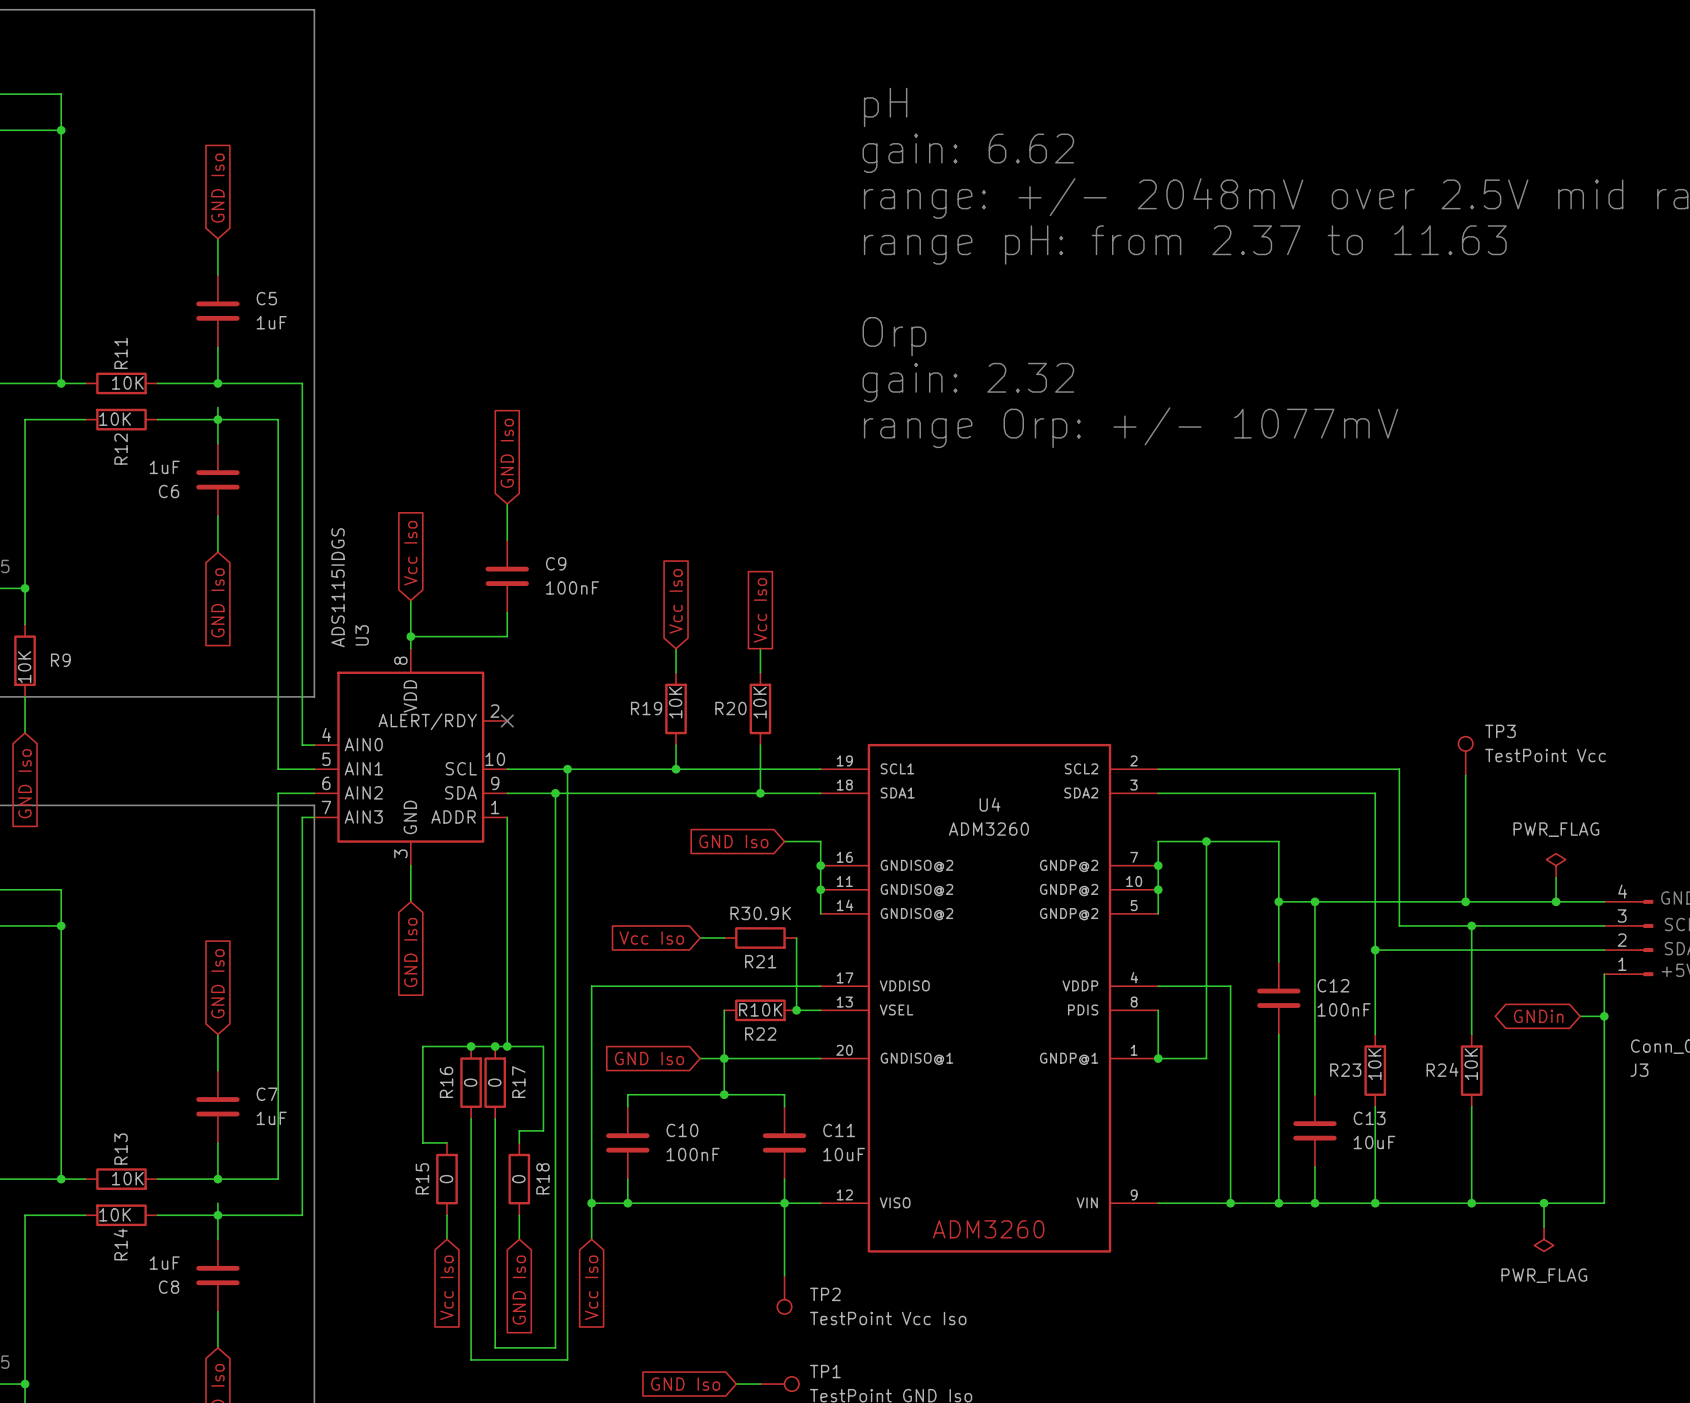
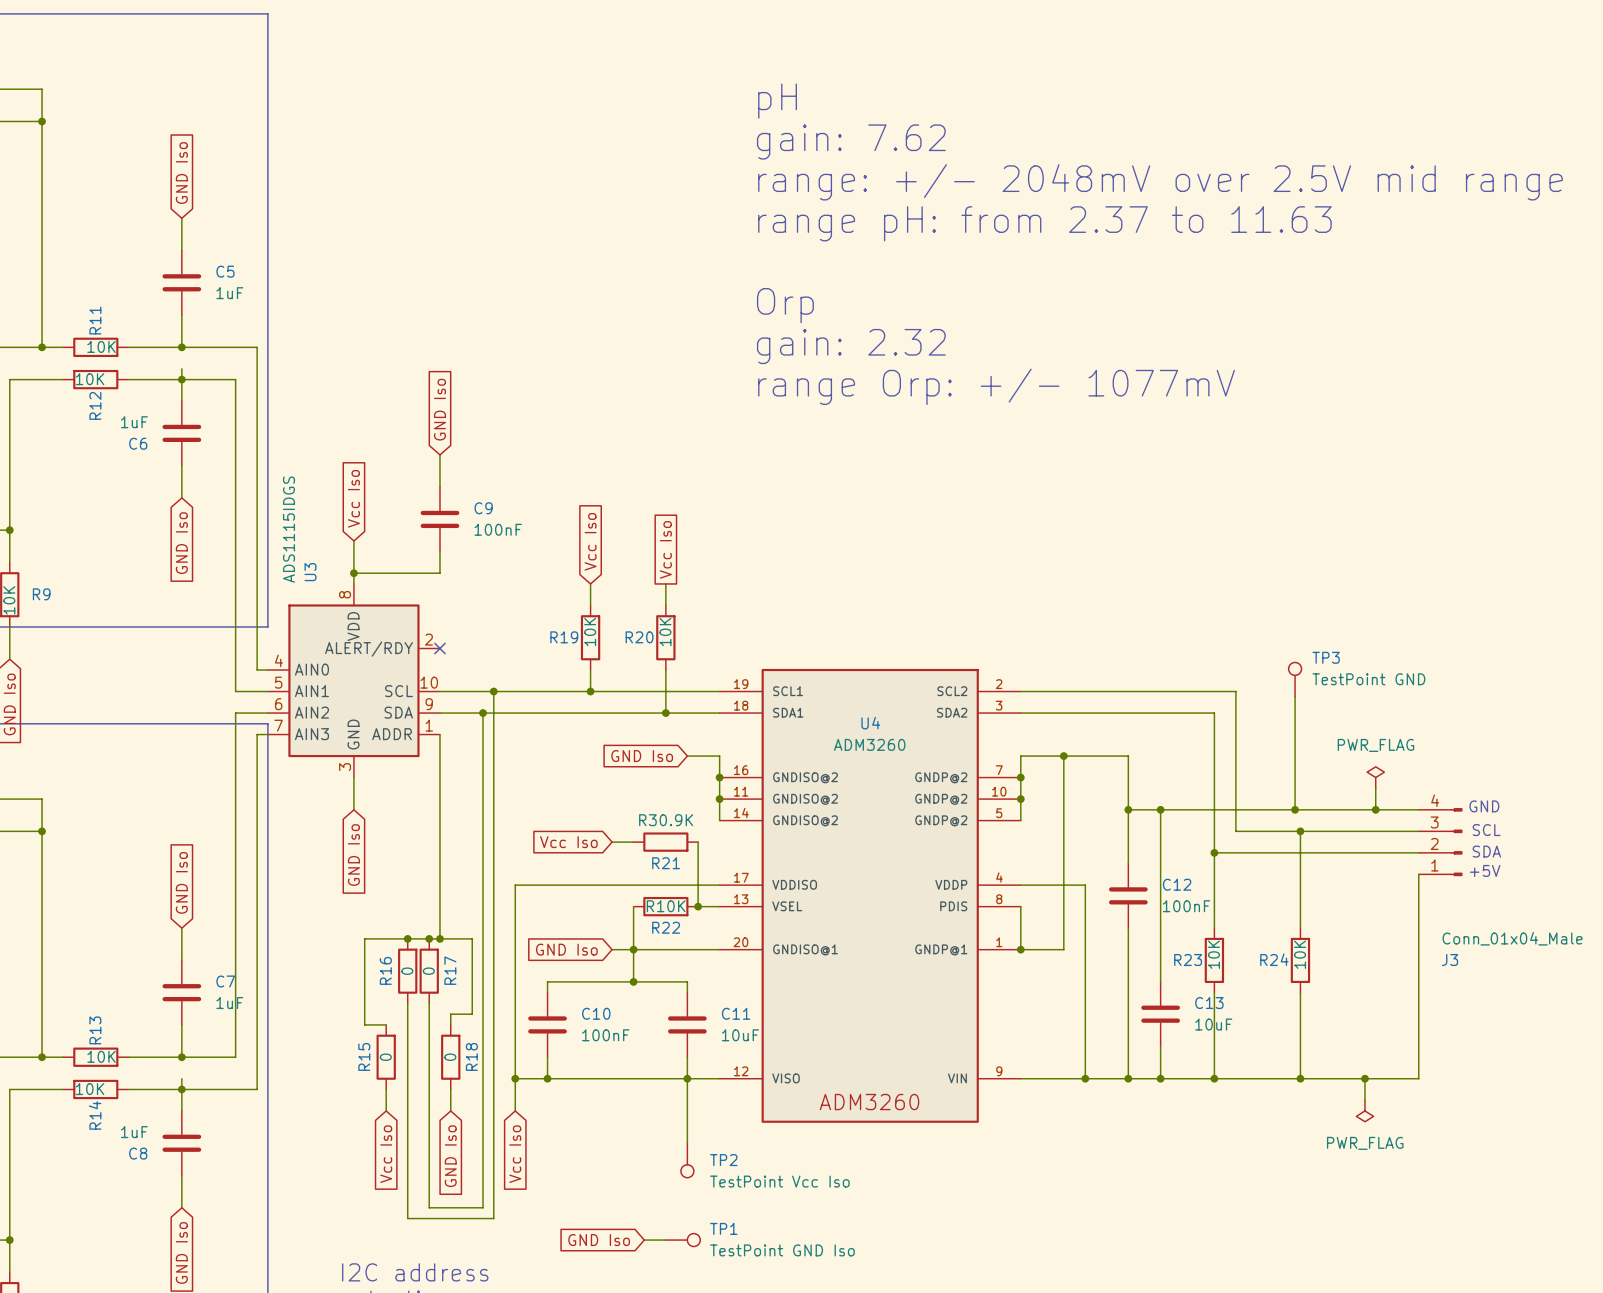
text: gain: 6.62 (968, 153) -> gain: 7.62 (851, 141)
TP3 value: TestPoint Vcc (1545, 755) -> TestPoint GND (1368, 679)
global label: GNDin (1538, 1016) -> none
wire: (1580, 1016) (1604, 1016) -> none
junction: (1604, 1016) -> none

